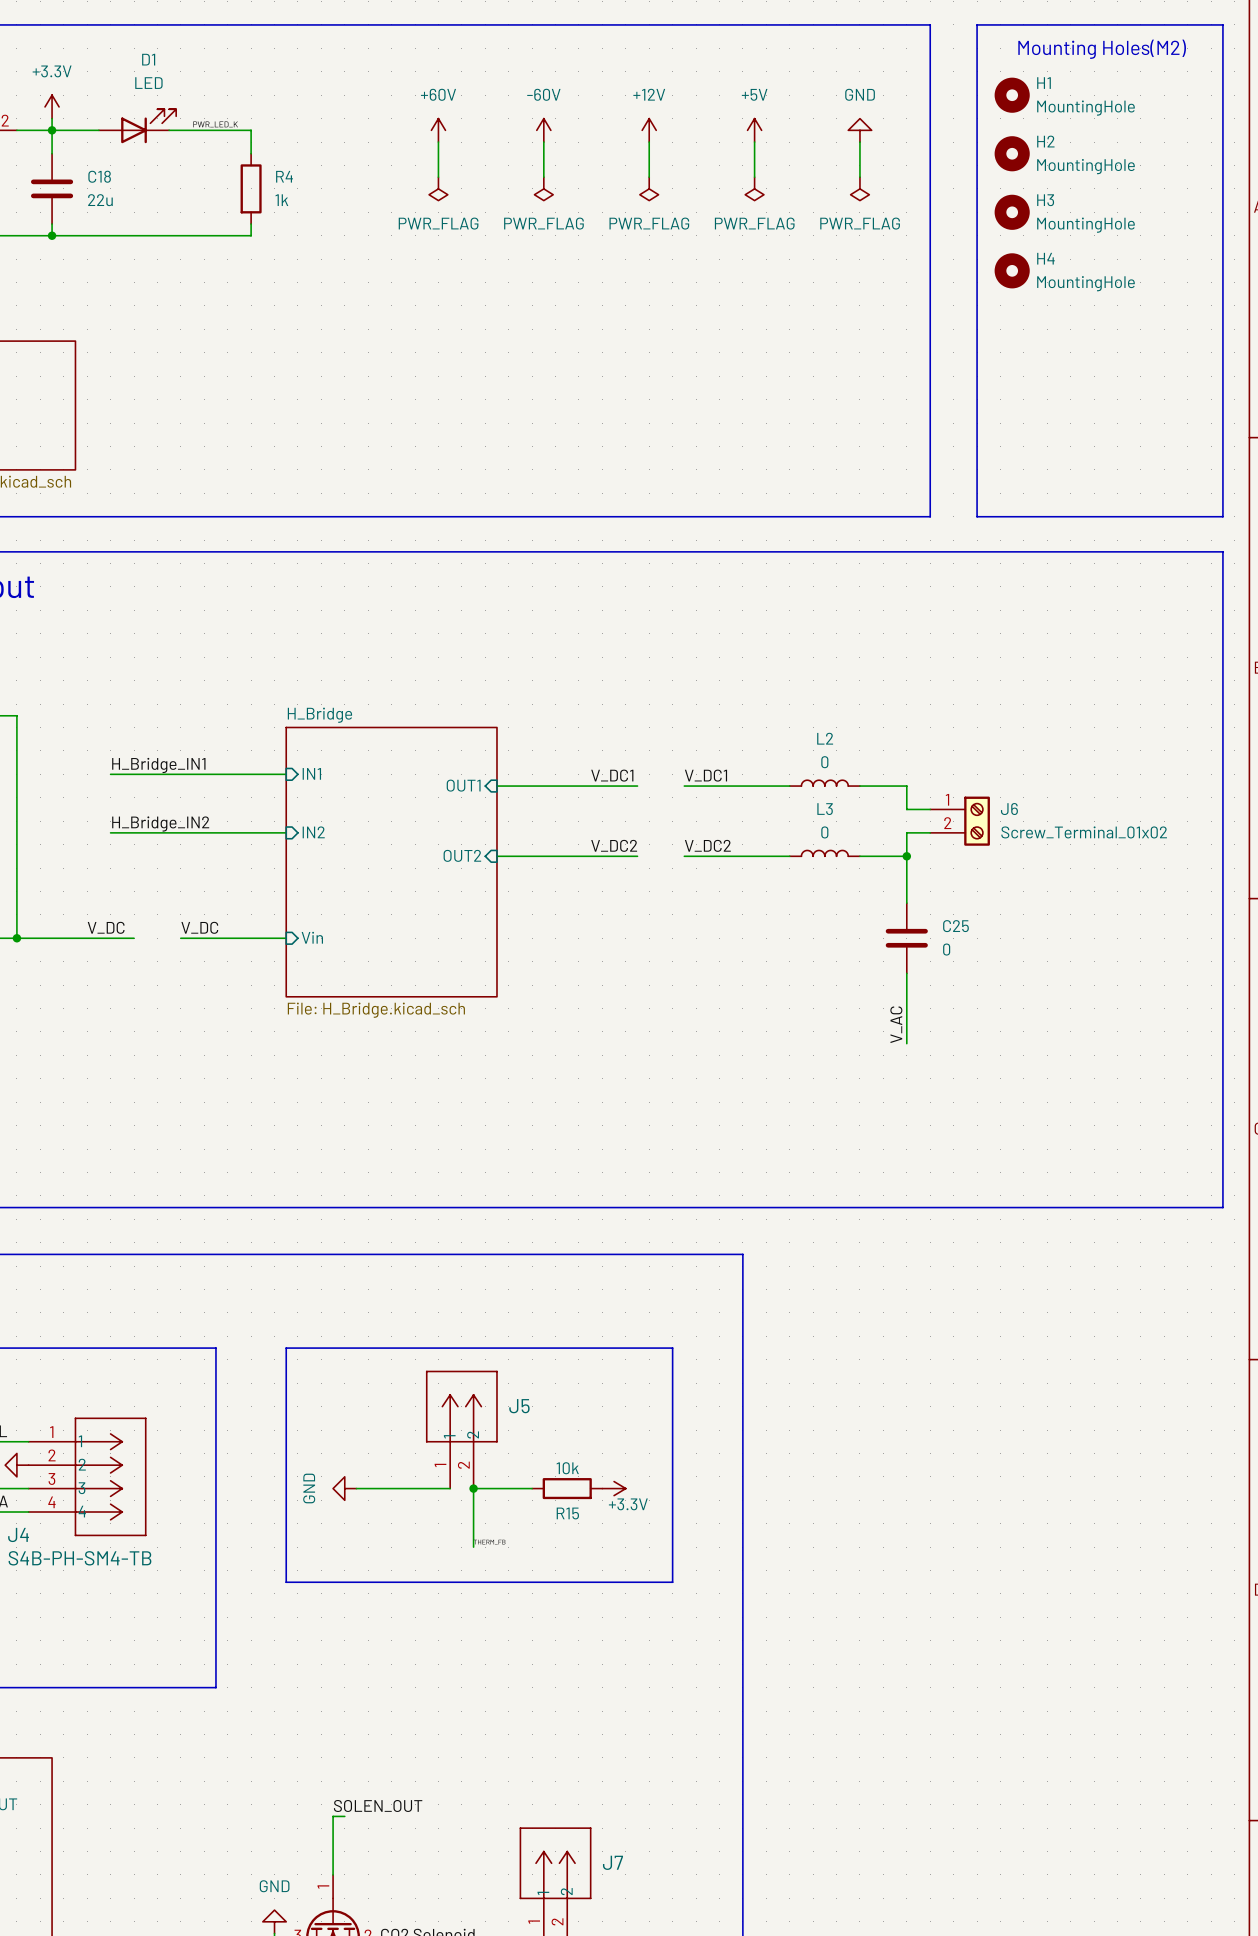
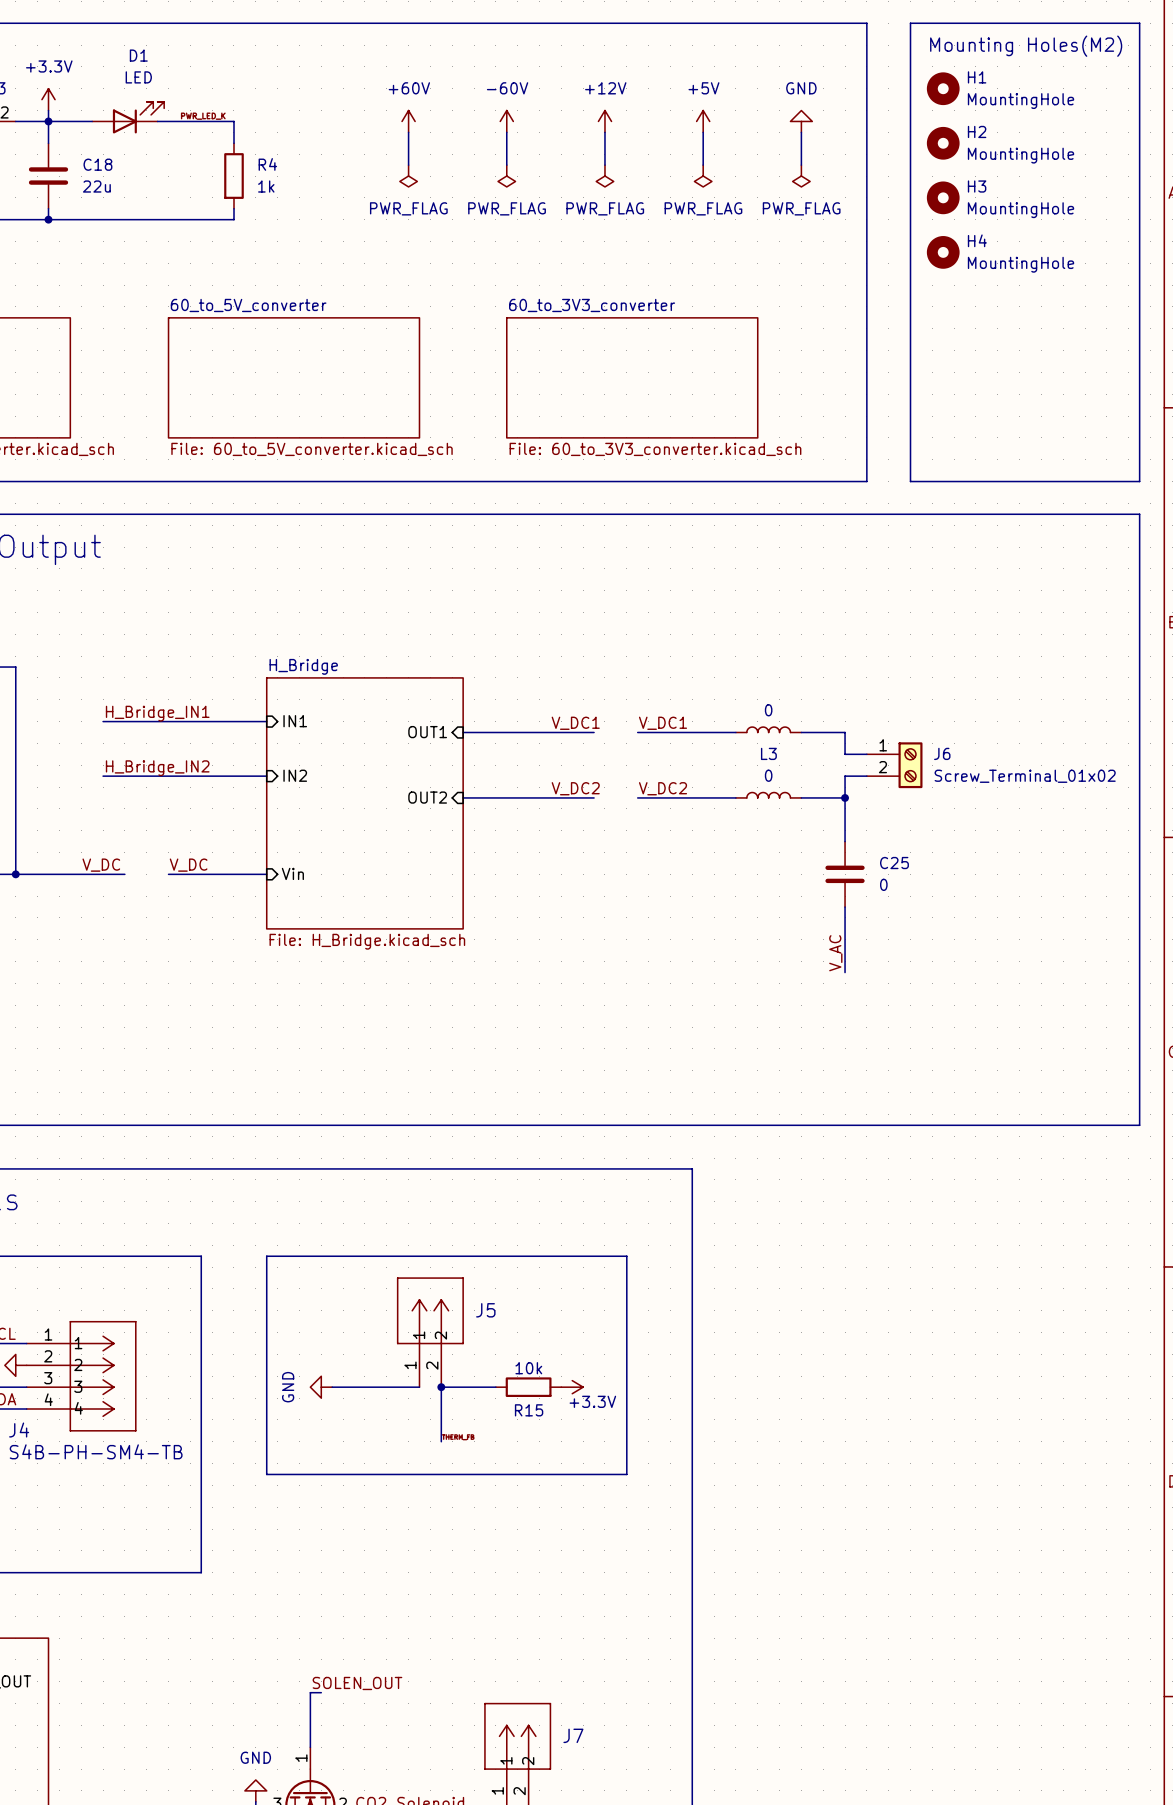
sheet 60_to_5V_converter: none -> File: 60_to_5V_converter.kicad_sch (294, 377)
sheet 60_to_3V3_converter: none -> File: 60_to_3V3_converter.kicad_sch (632, 377)
L2 name: L2 (825, 738) -> none

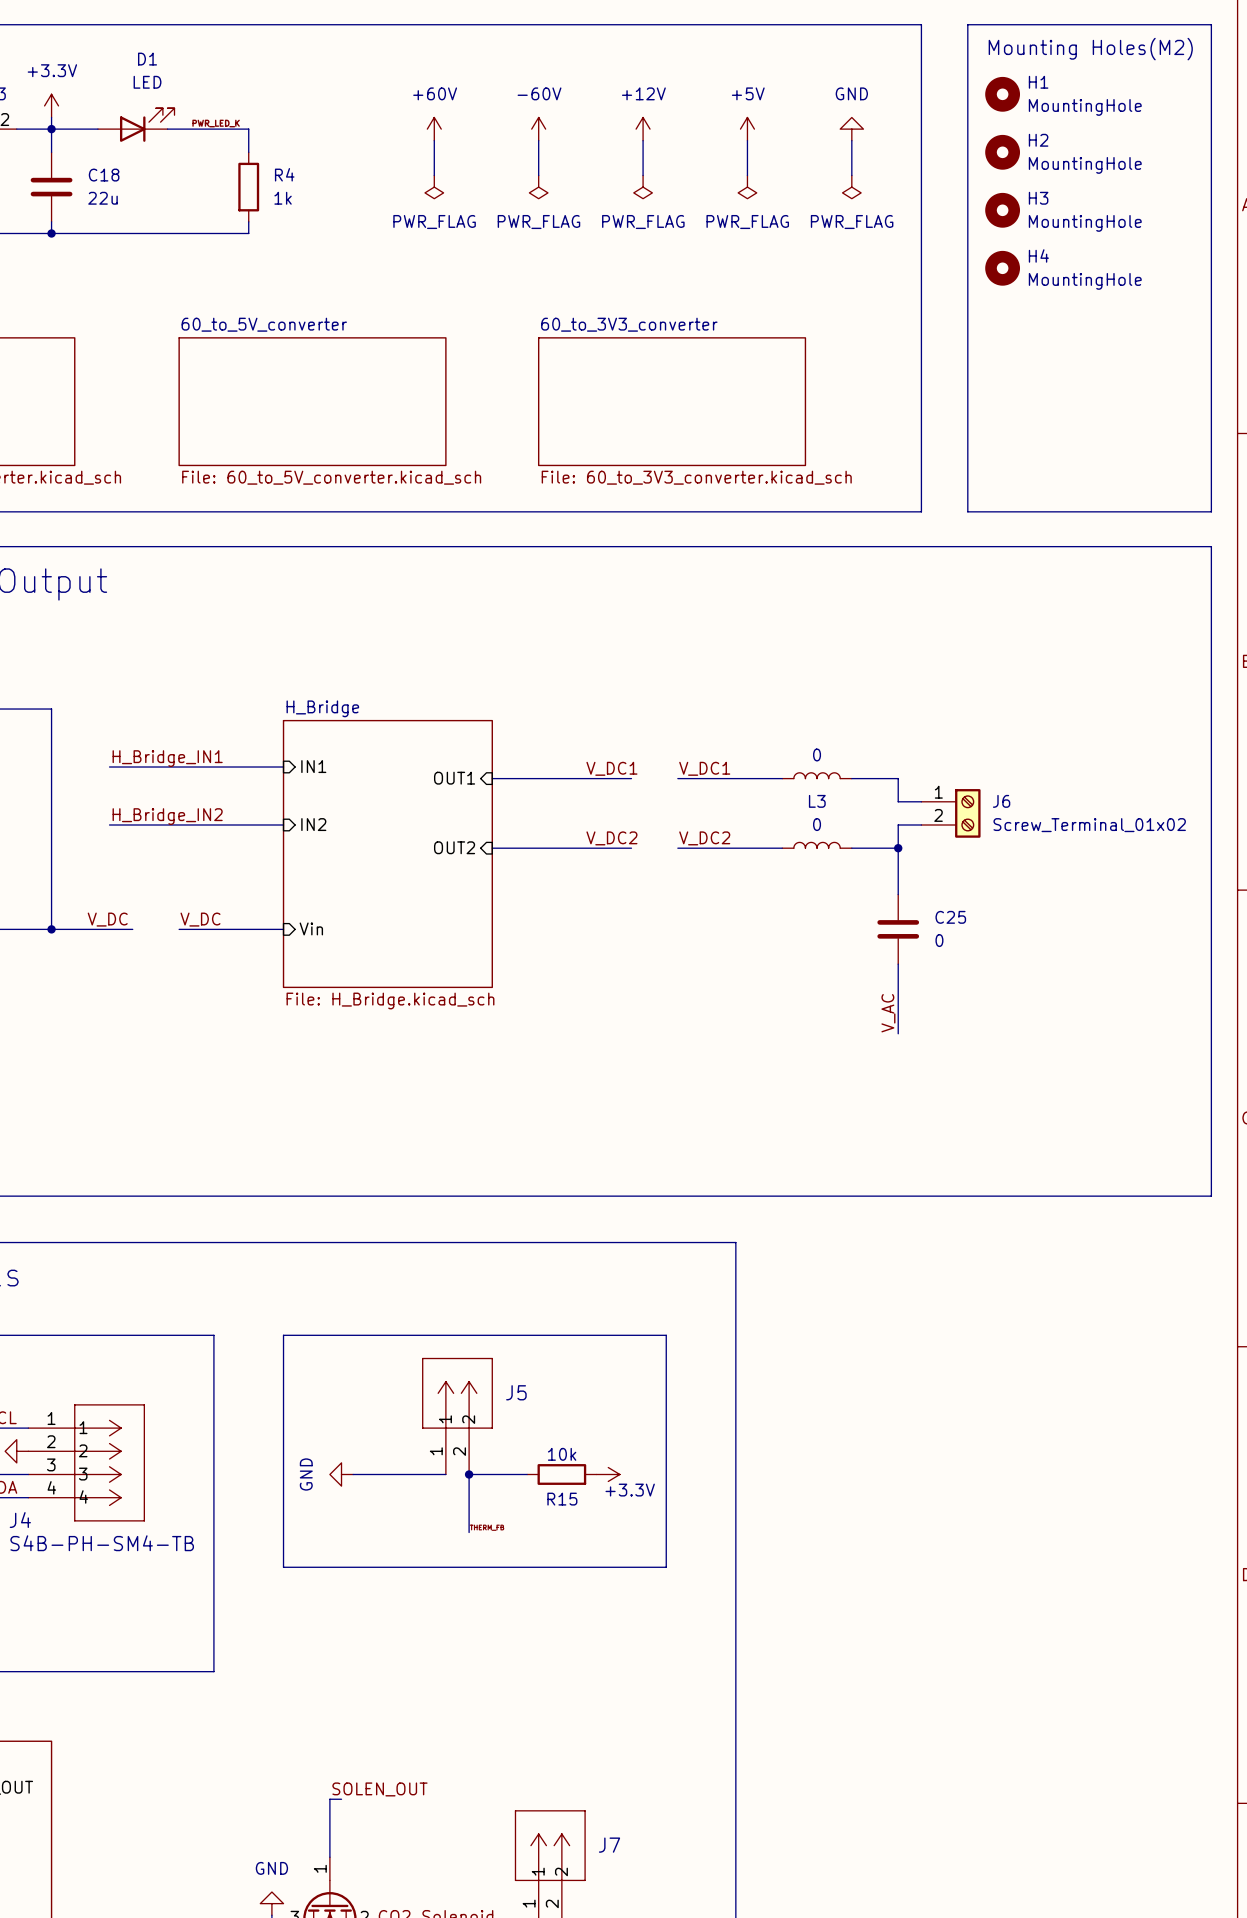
wire: (15, 667) (15, 874) -> (16, 709) (51, 709) (51, 929)
junction position: (15, 874) -> (51, 929)

